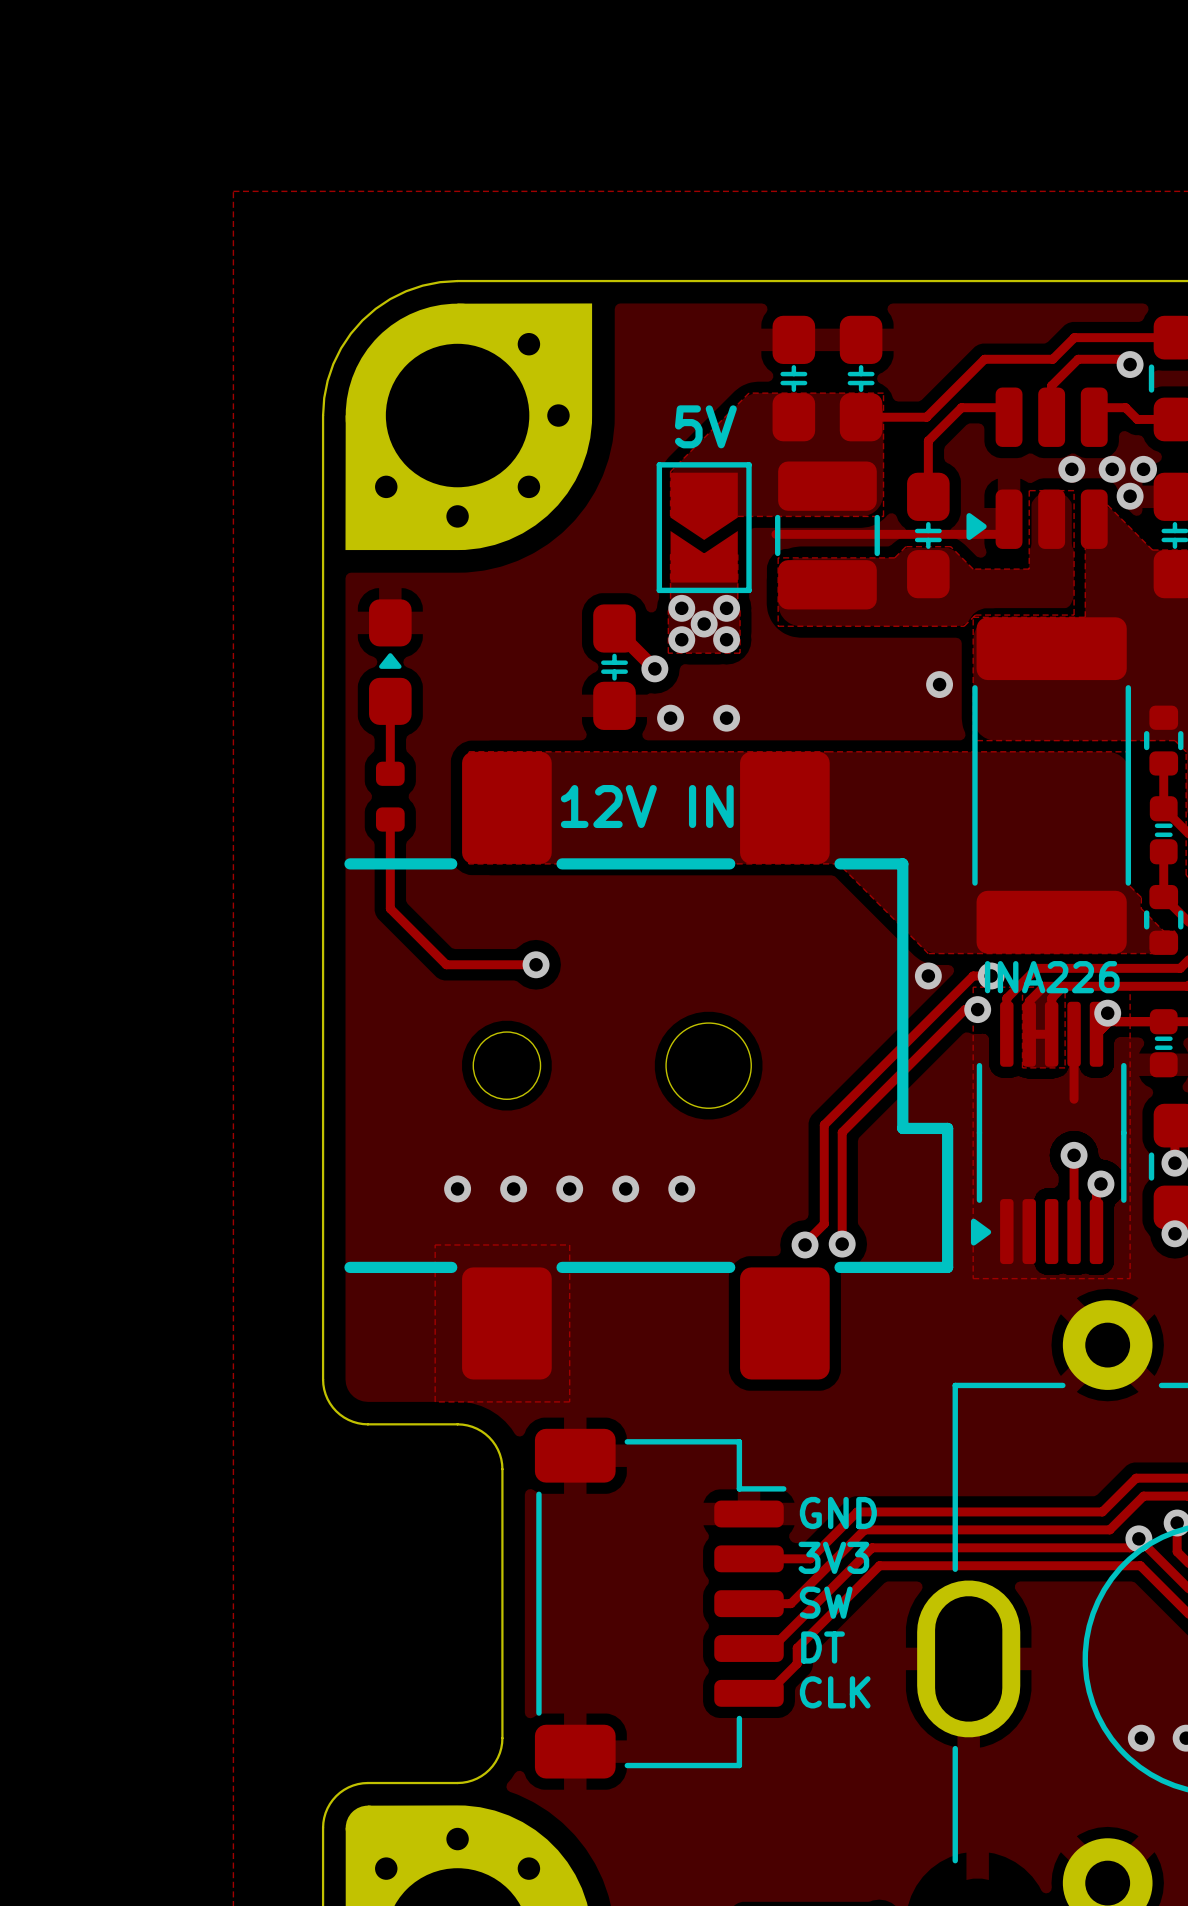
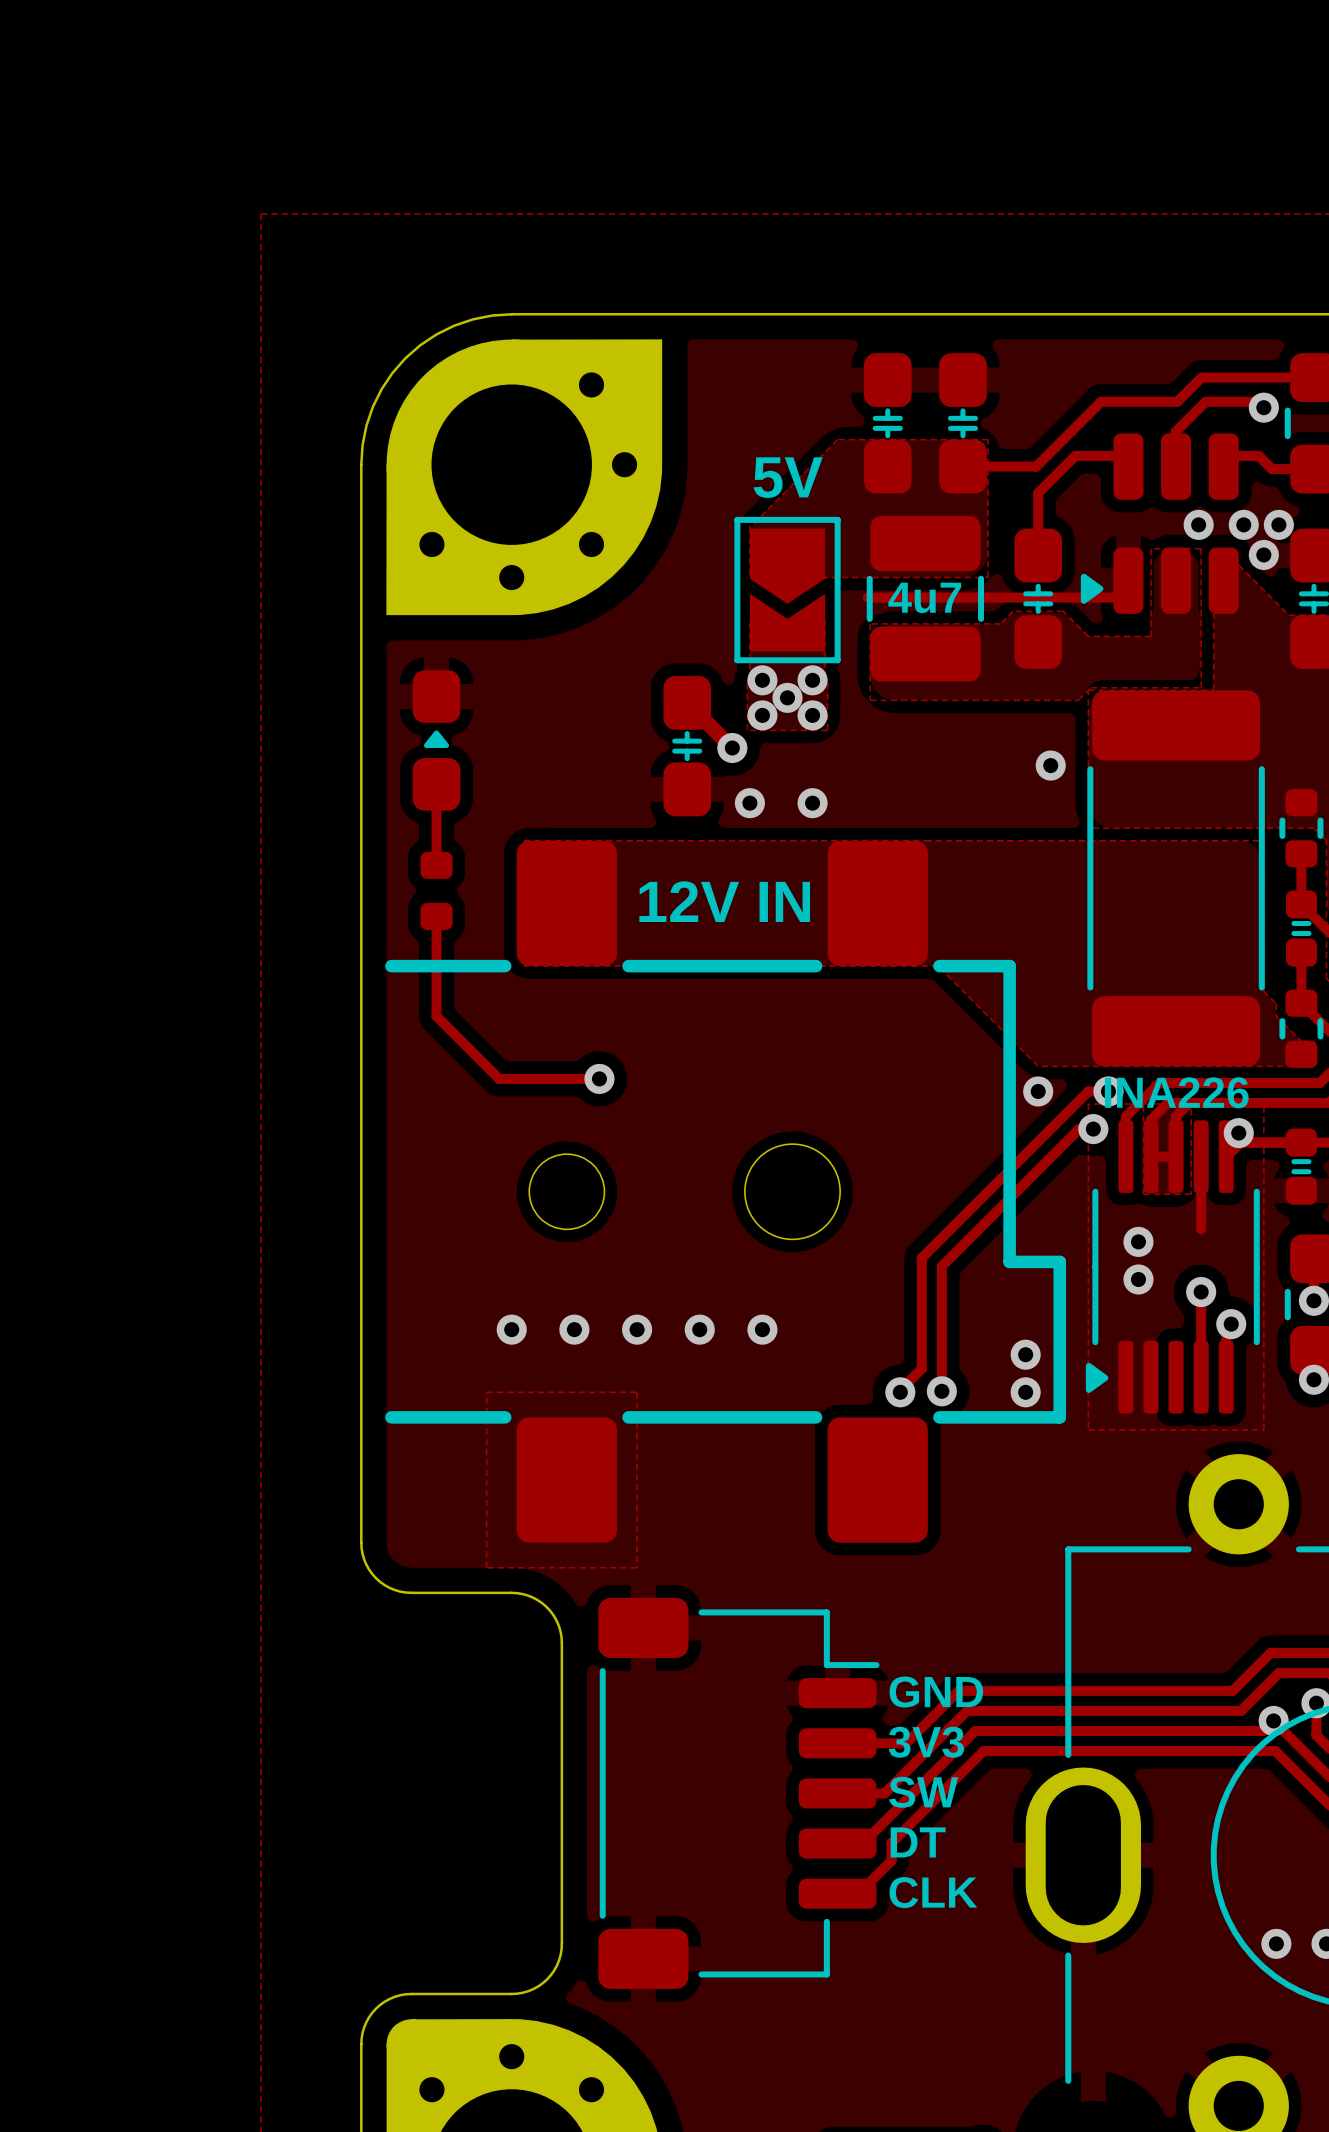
text: none -> 4u7 (924, 597)
via: none -> (1138, 1241)
via: none -> (1138, 1279)
via: none -> (1025, 1354)
via: none -> (1025, 1392)

